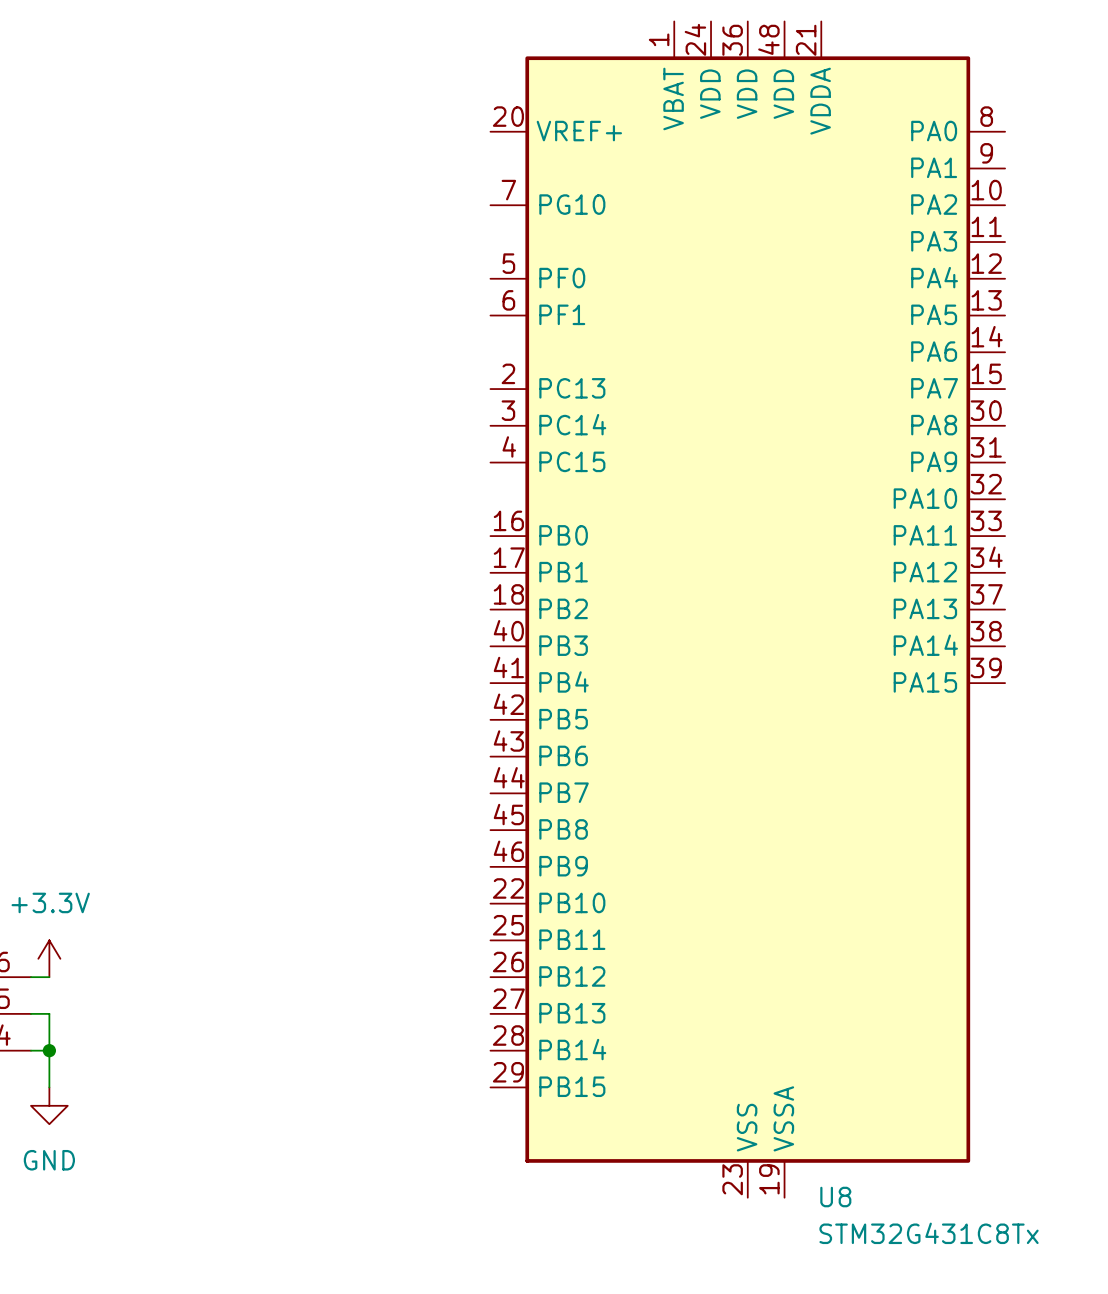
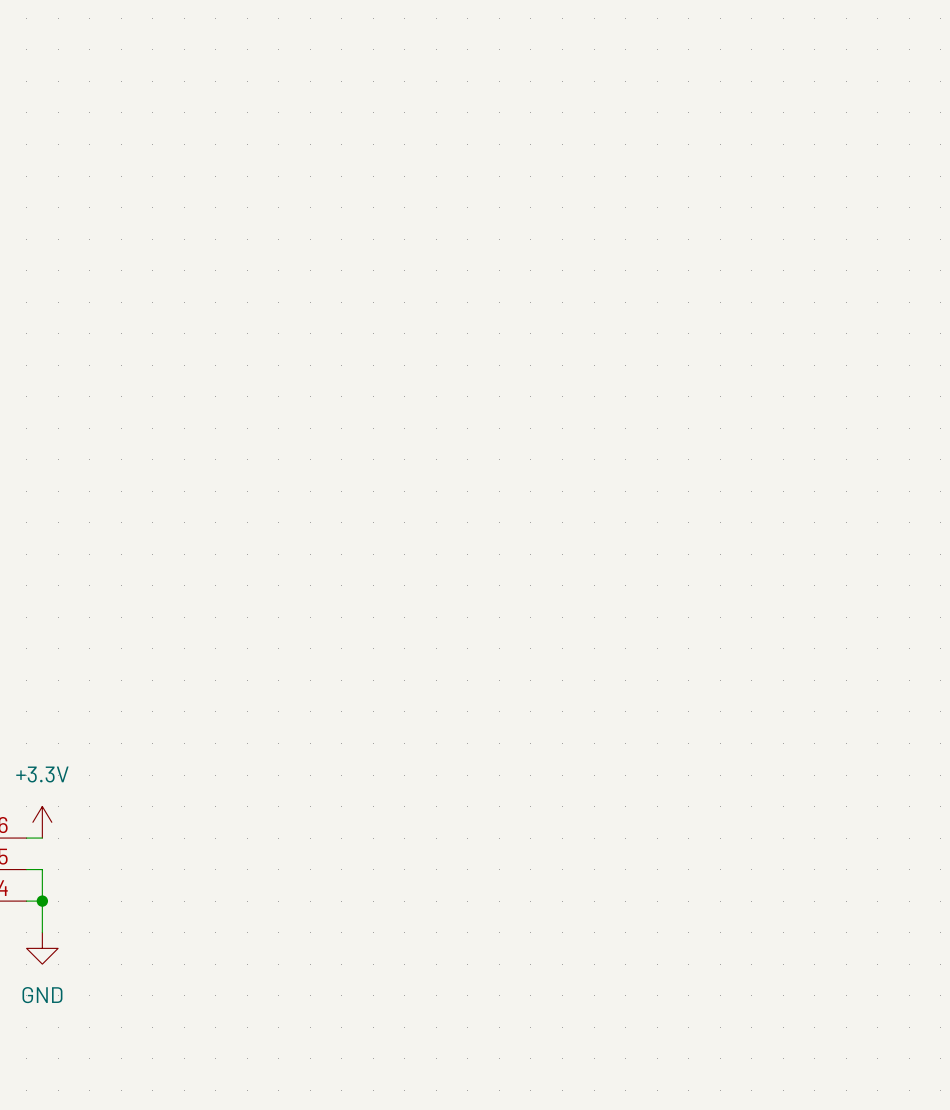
U8: STM32G431C8Tx (747, 609) -> none

